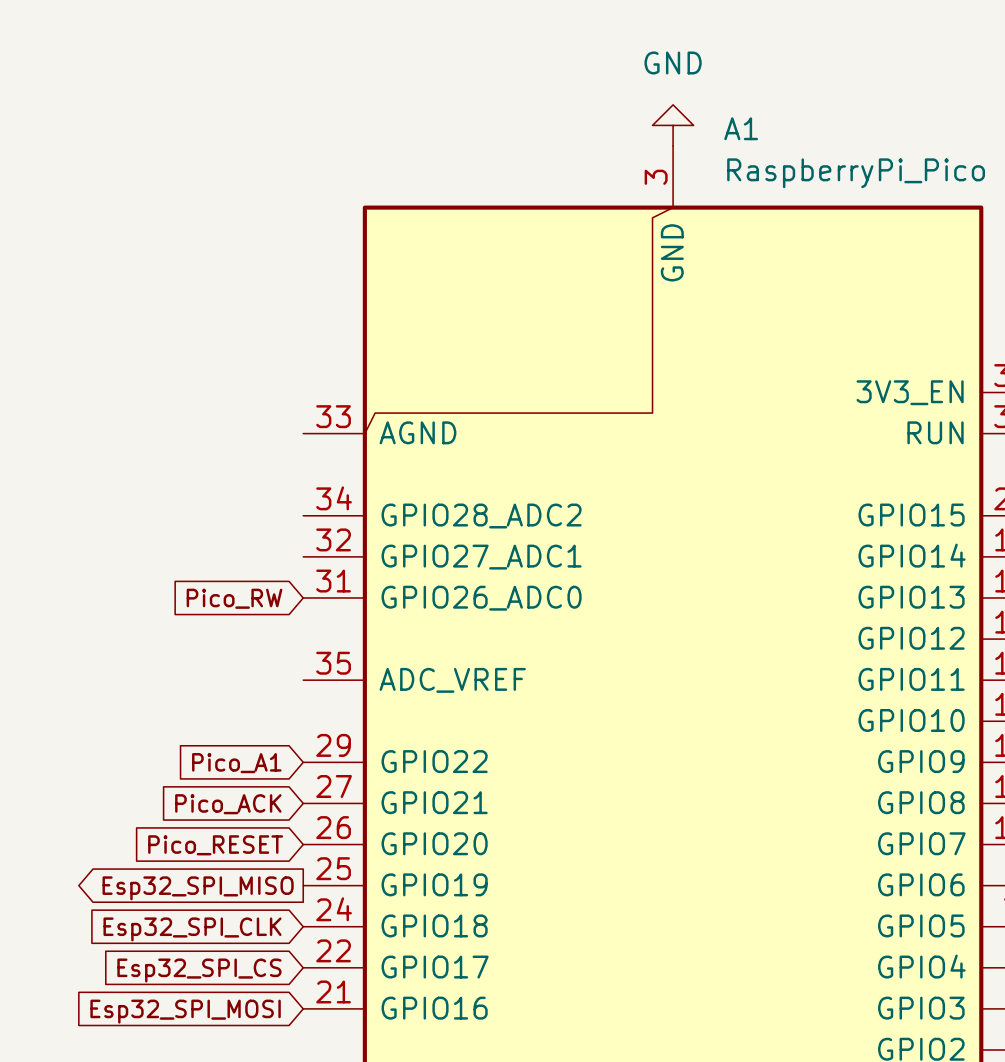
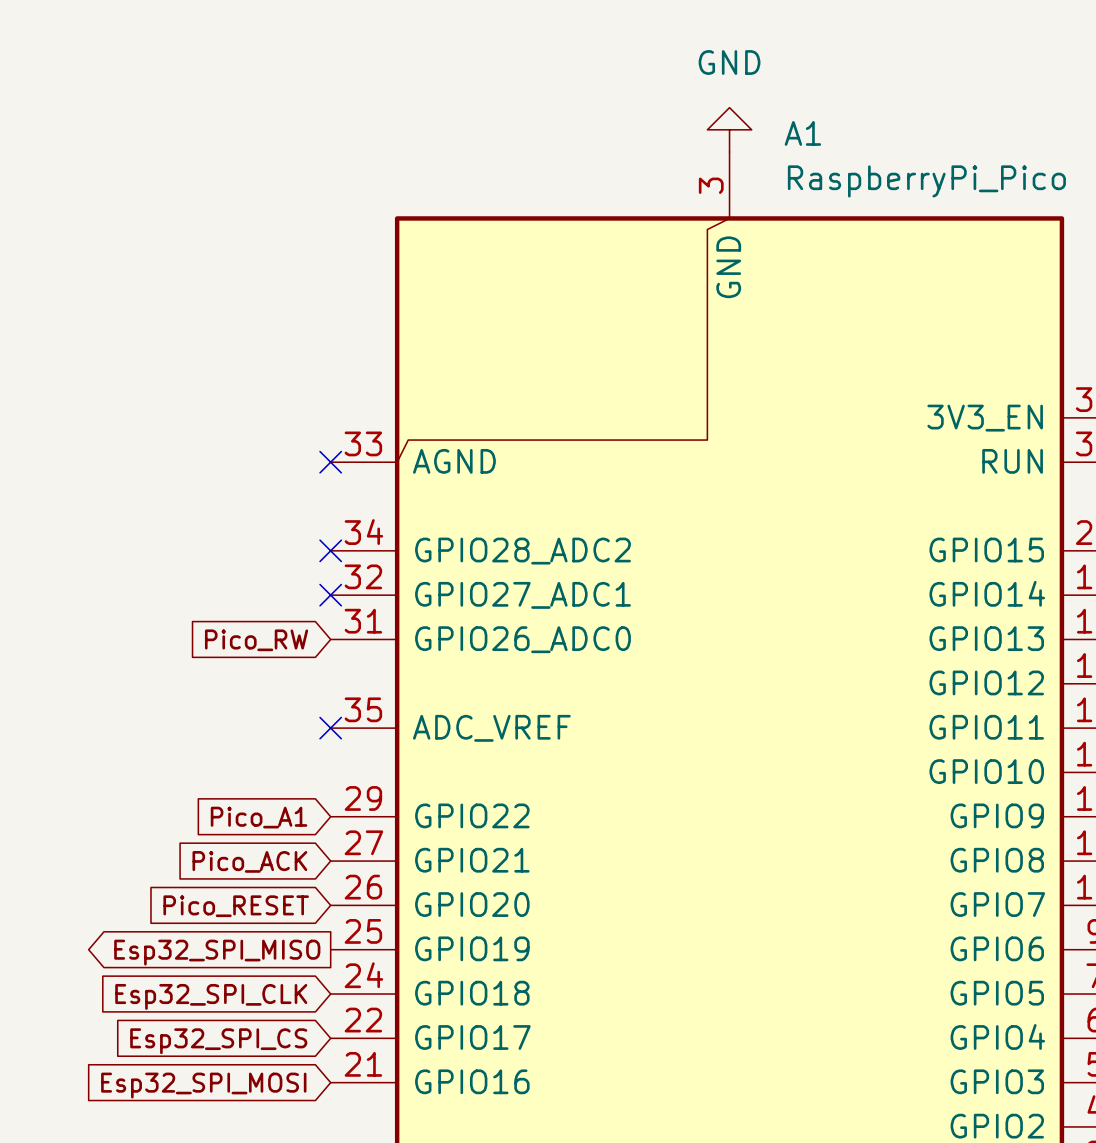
no-connect mark: none -> (330, 462)
no-connect mark: none -> (330, 550)
no-connect mark: none -> (330, 595)
no-connect mark: none -> (330, 728)

